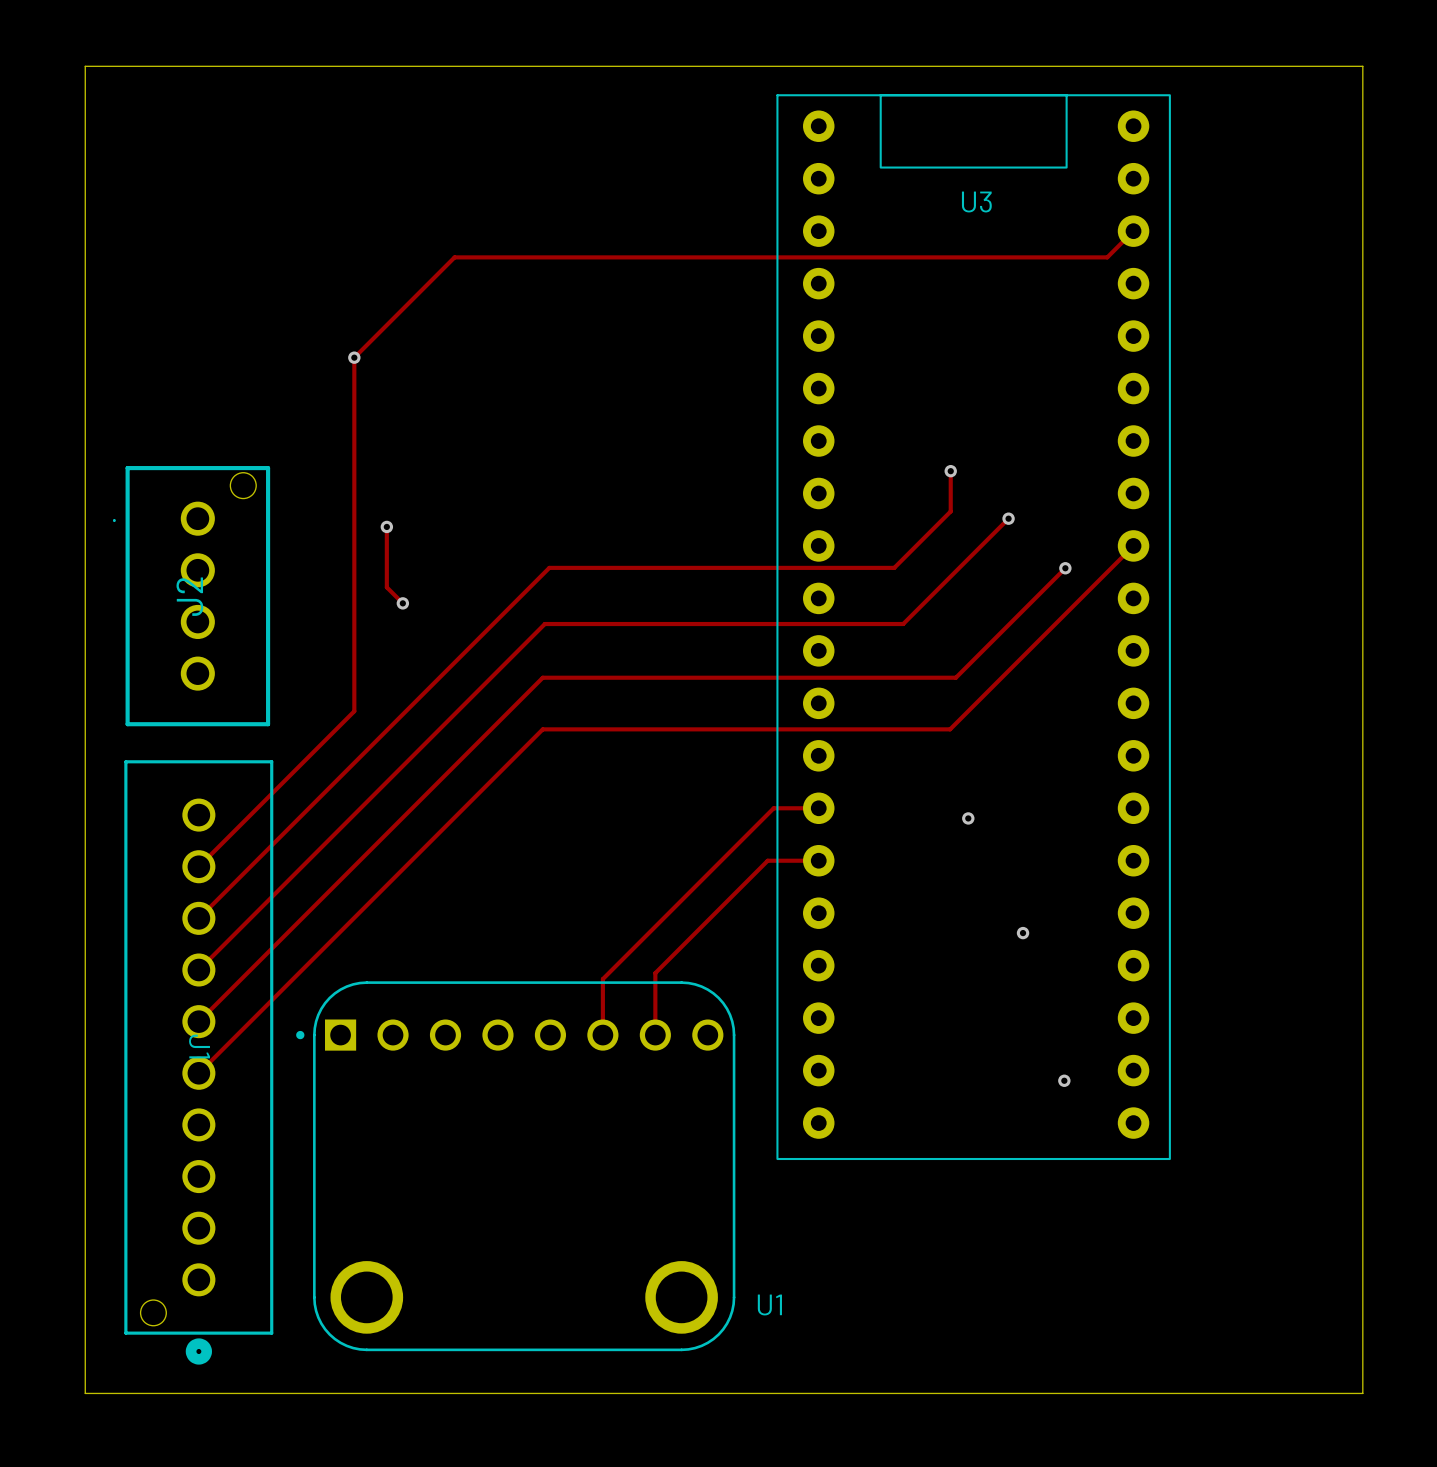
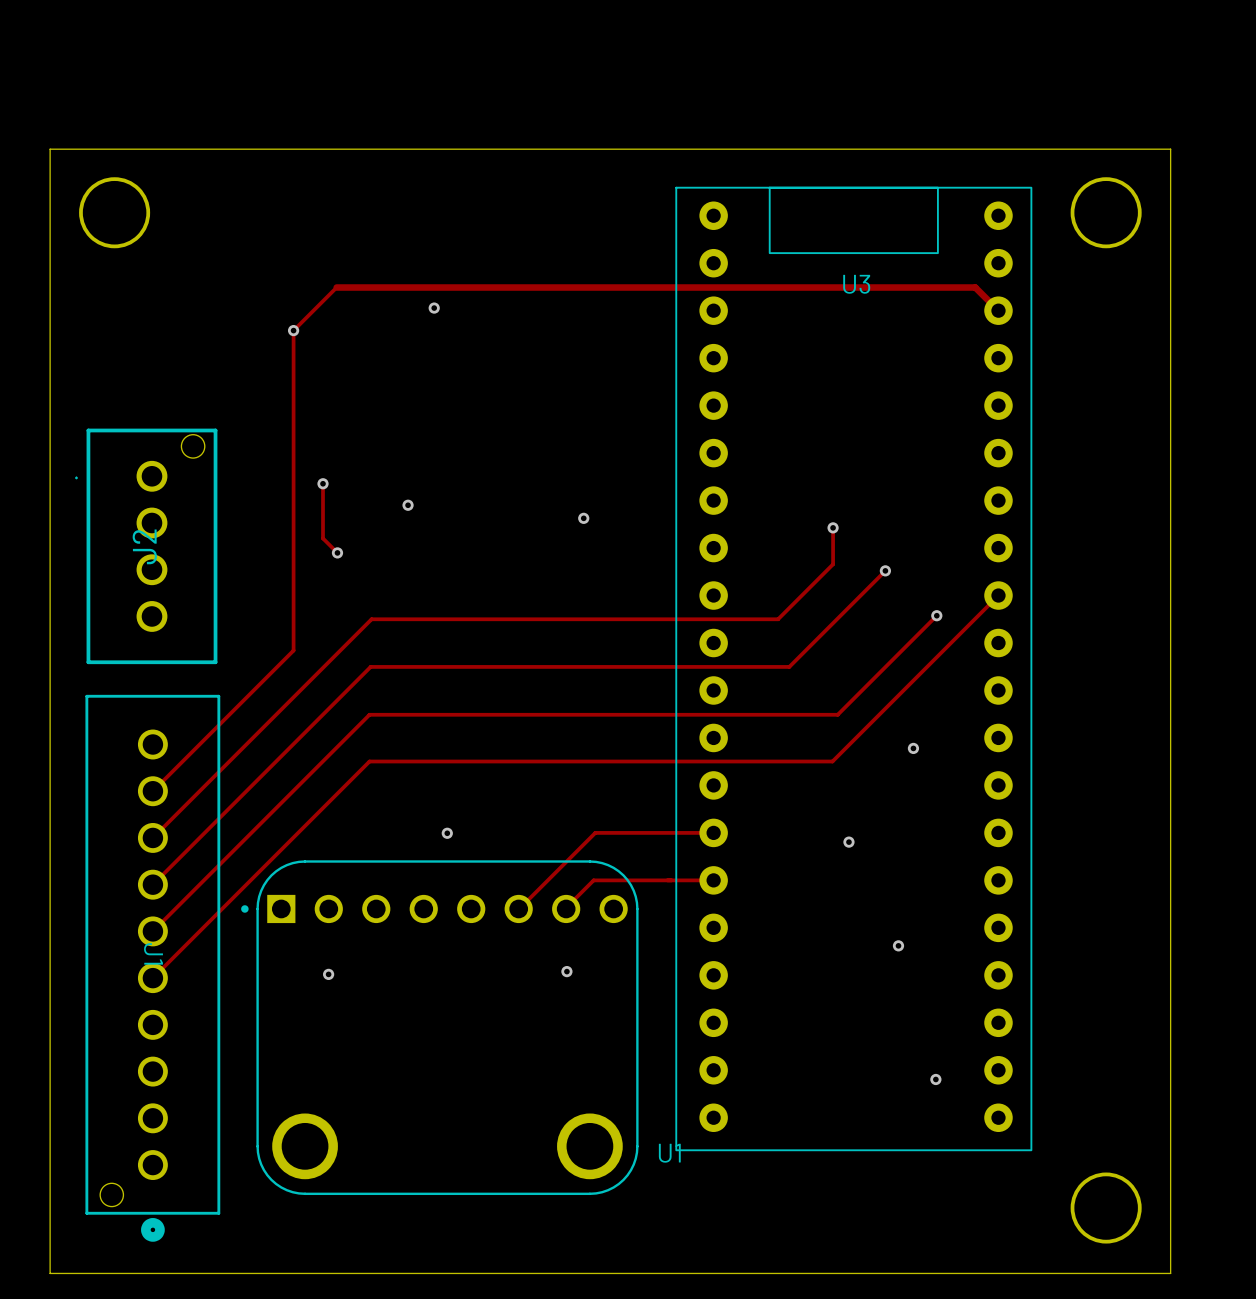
board edge: (85, 157) (85, 66) (1362, 66) (1362, 1393) (85, 1393) -> (50, 149) (1170, 149) (1170, 1273) (50, 1273) (50, 1267)
round board edge: none -> [79, 177, 151, 249]
round board edge: none -> [1070, 177, 1142, 249]
track: (1133, 231) (1107, 257) (454, 257) (401, 310) -> (998, 310) (975, 287) (336, 287)
via: none -> (434, 308)
track: (950, 471) (950, 511) (894, 567) (549, 567) (440, 676) -> (833, 527) (833, 564) (778, 619) (371, 619)
via: (950, 471) -> none
track: (1008, 518) (903, 624) (544, 624) (439, 729) -> none
via: (1008, 518) -> none
track: (1133, 545) (950, 729) (902, 729) -> (885, 570) (789, 666)
via: none -> (408, 505)
via: none -> (583, 518)
track: (1065, 568) (955, 677) (542, 677) (438, 782) -> (936, 615) (837, 714) (369, 714)
via: (1065, 568) -> none
via: none -> (833, 527)
via: none -> (885, 570)
U3 position: (973, 627) -> (853, 668)
track: none -> (998, 595) (832, 761) (369, 761)
via: none -> (936, 615)
track: (542, 729) (438, 833) -> (464, 666) (370, 666)
track: (818, 808) (773, 808) (602, 979) (602, 1035) -> none
via: (968, 818) -> none
via: none -> (913, 748)
track: (818, 860) (767, 860) (655, 973) (655, 1035) -> none
track: none -> (713, 832) (595, 832) (518, 908)
via: none -> (447, 833)
via: none -> (848, 842)
via: (1023, 933) -> none
track: none -> (713, 880) (593, 880) (566, 908)
via: none -> (898, 945)
via: none -> (566, 971)
via: none -> (328, 974)
via: (1064, 1080) -> none
U1 position: (515, 1166) -> (439, 1027)
via: none -> (935, 1079)
round board edge: none -> [1070, 1172, 1142, 1244]

